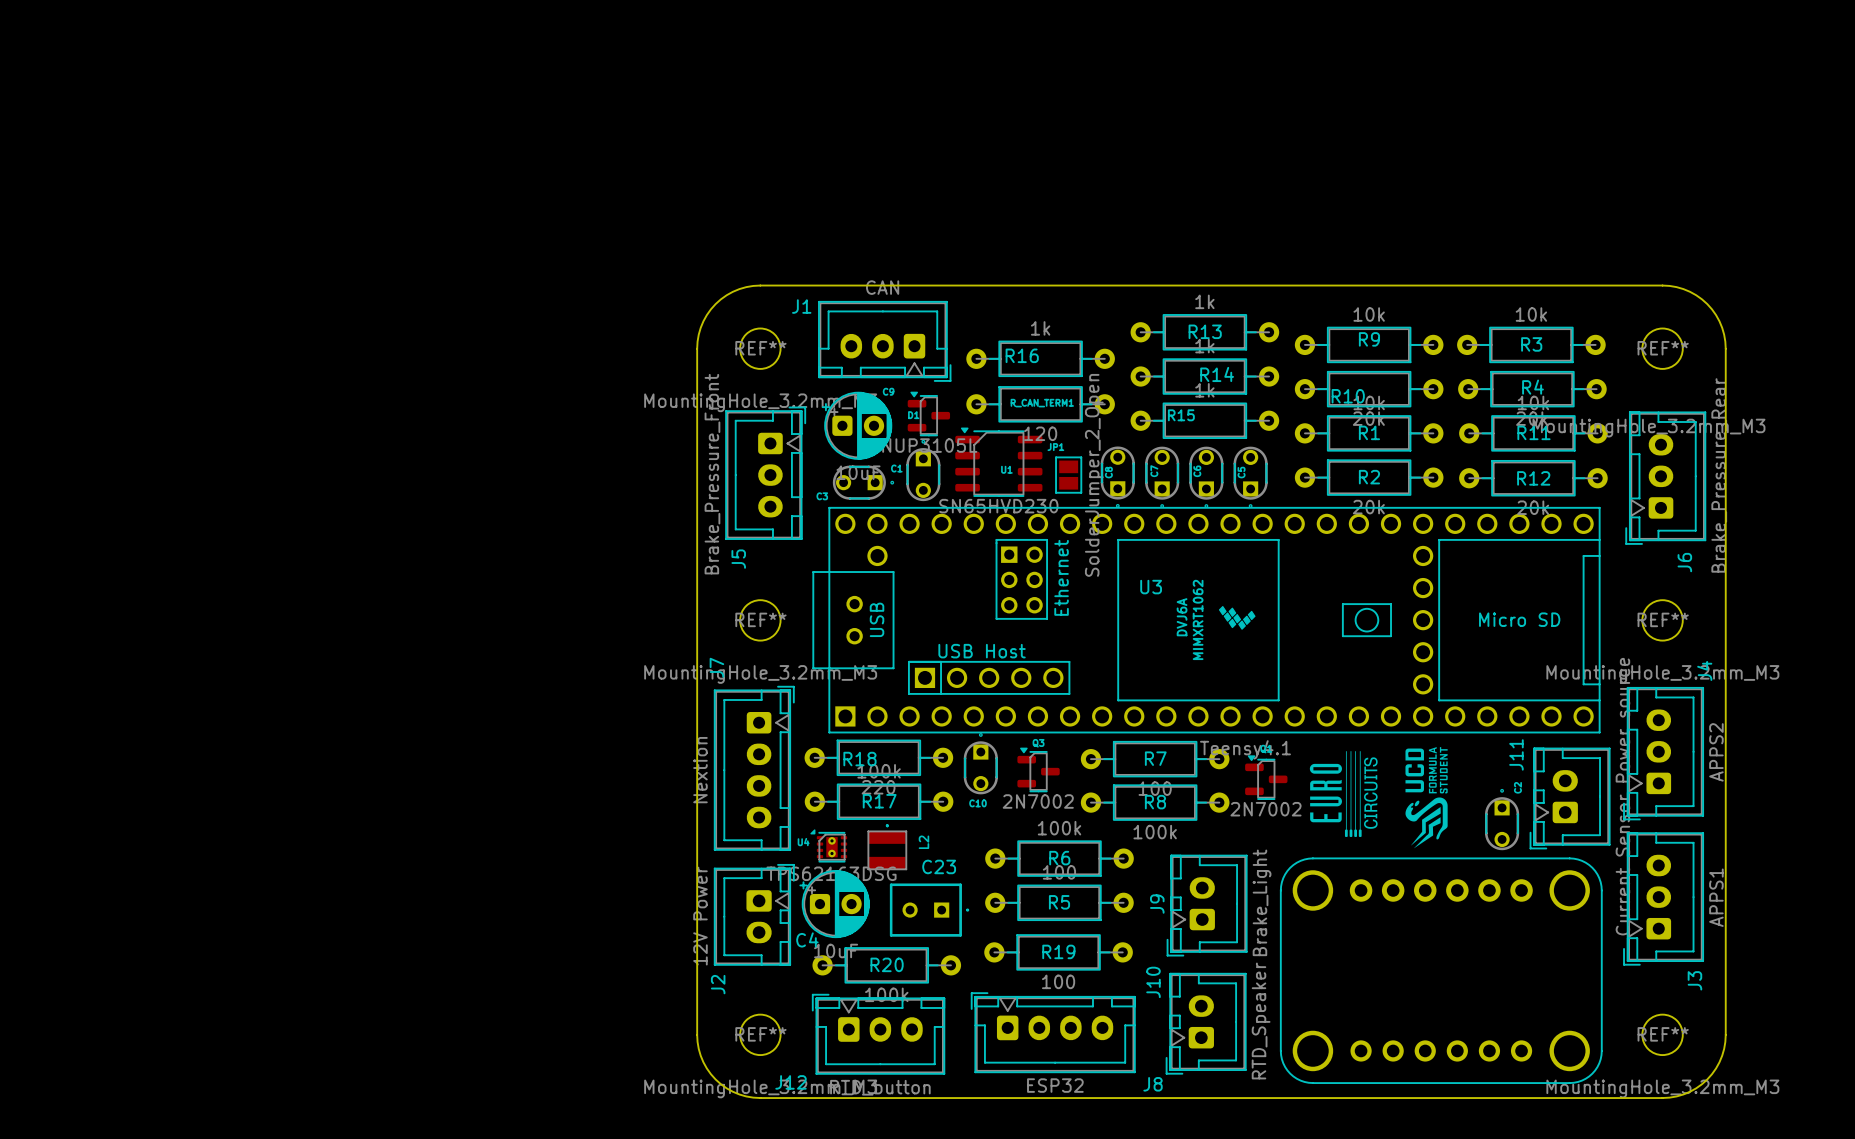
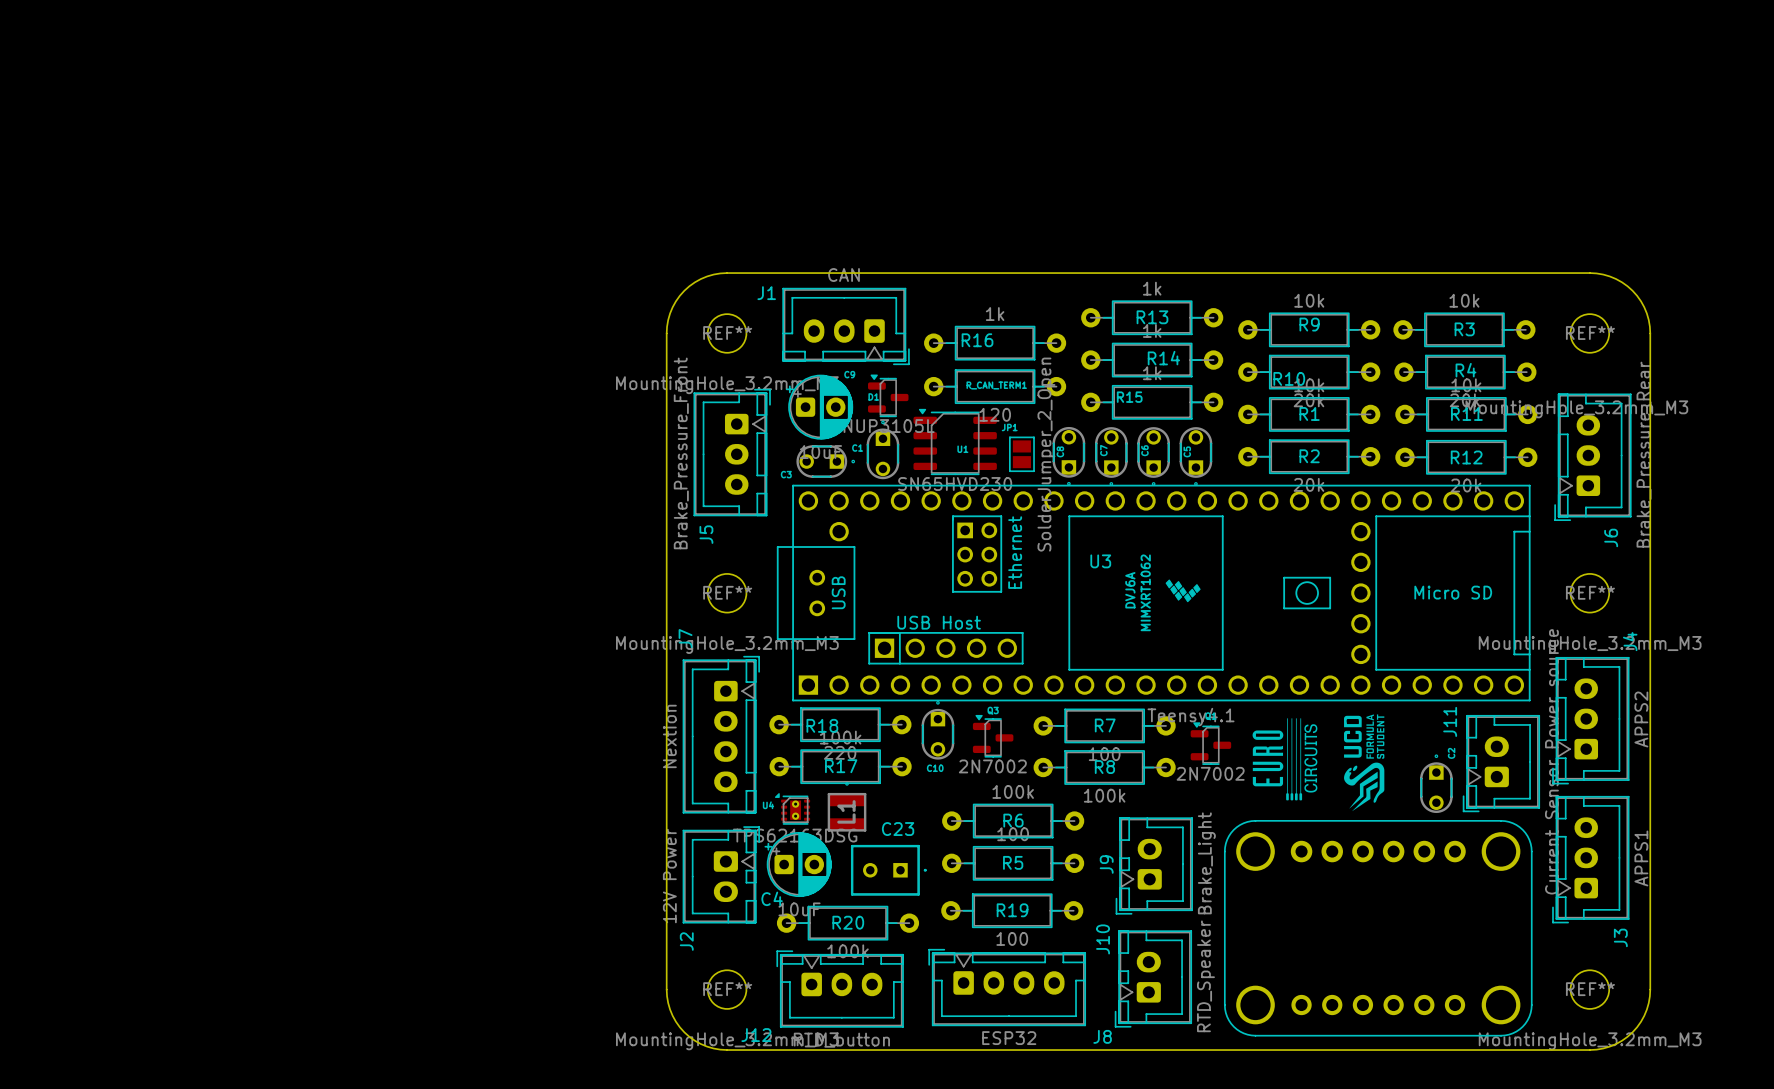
L1: none -> (847, 806)
L2: (887, 847) -> none

